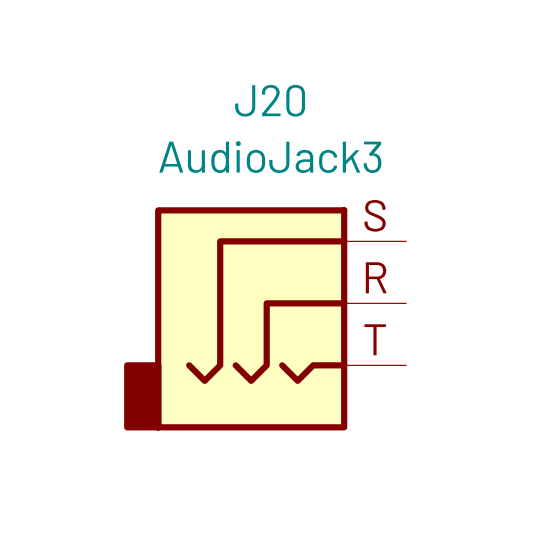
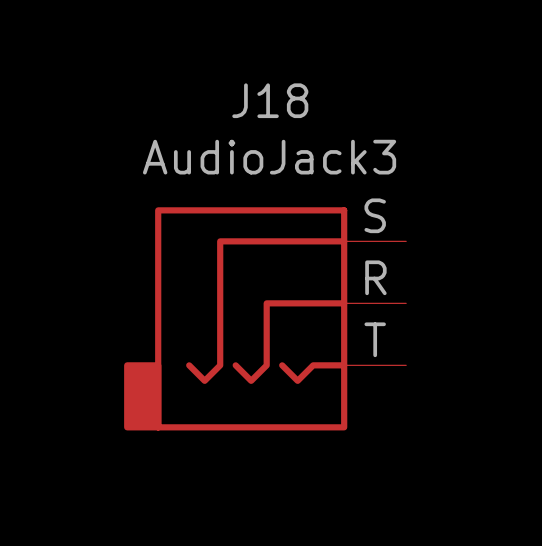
J20 name: J20 (270, 100) -> J18 (270, 100)

